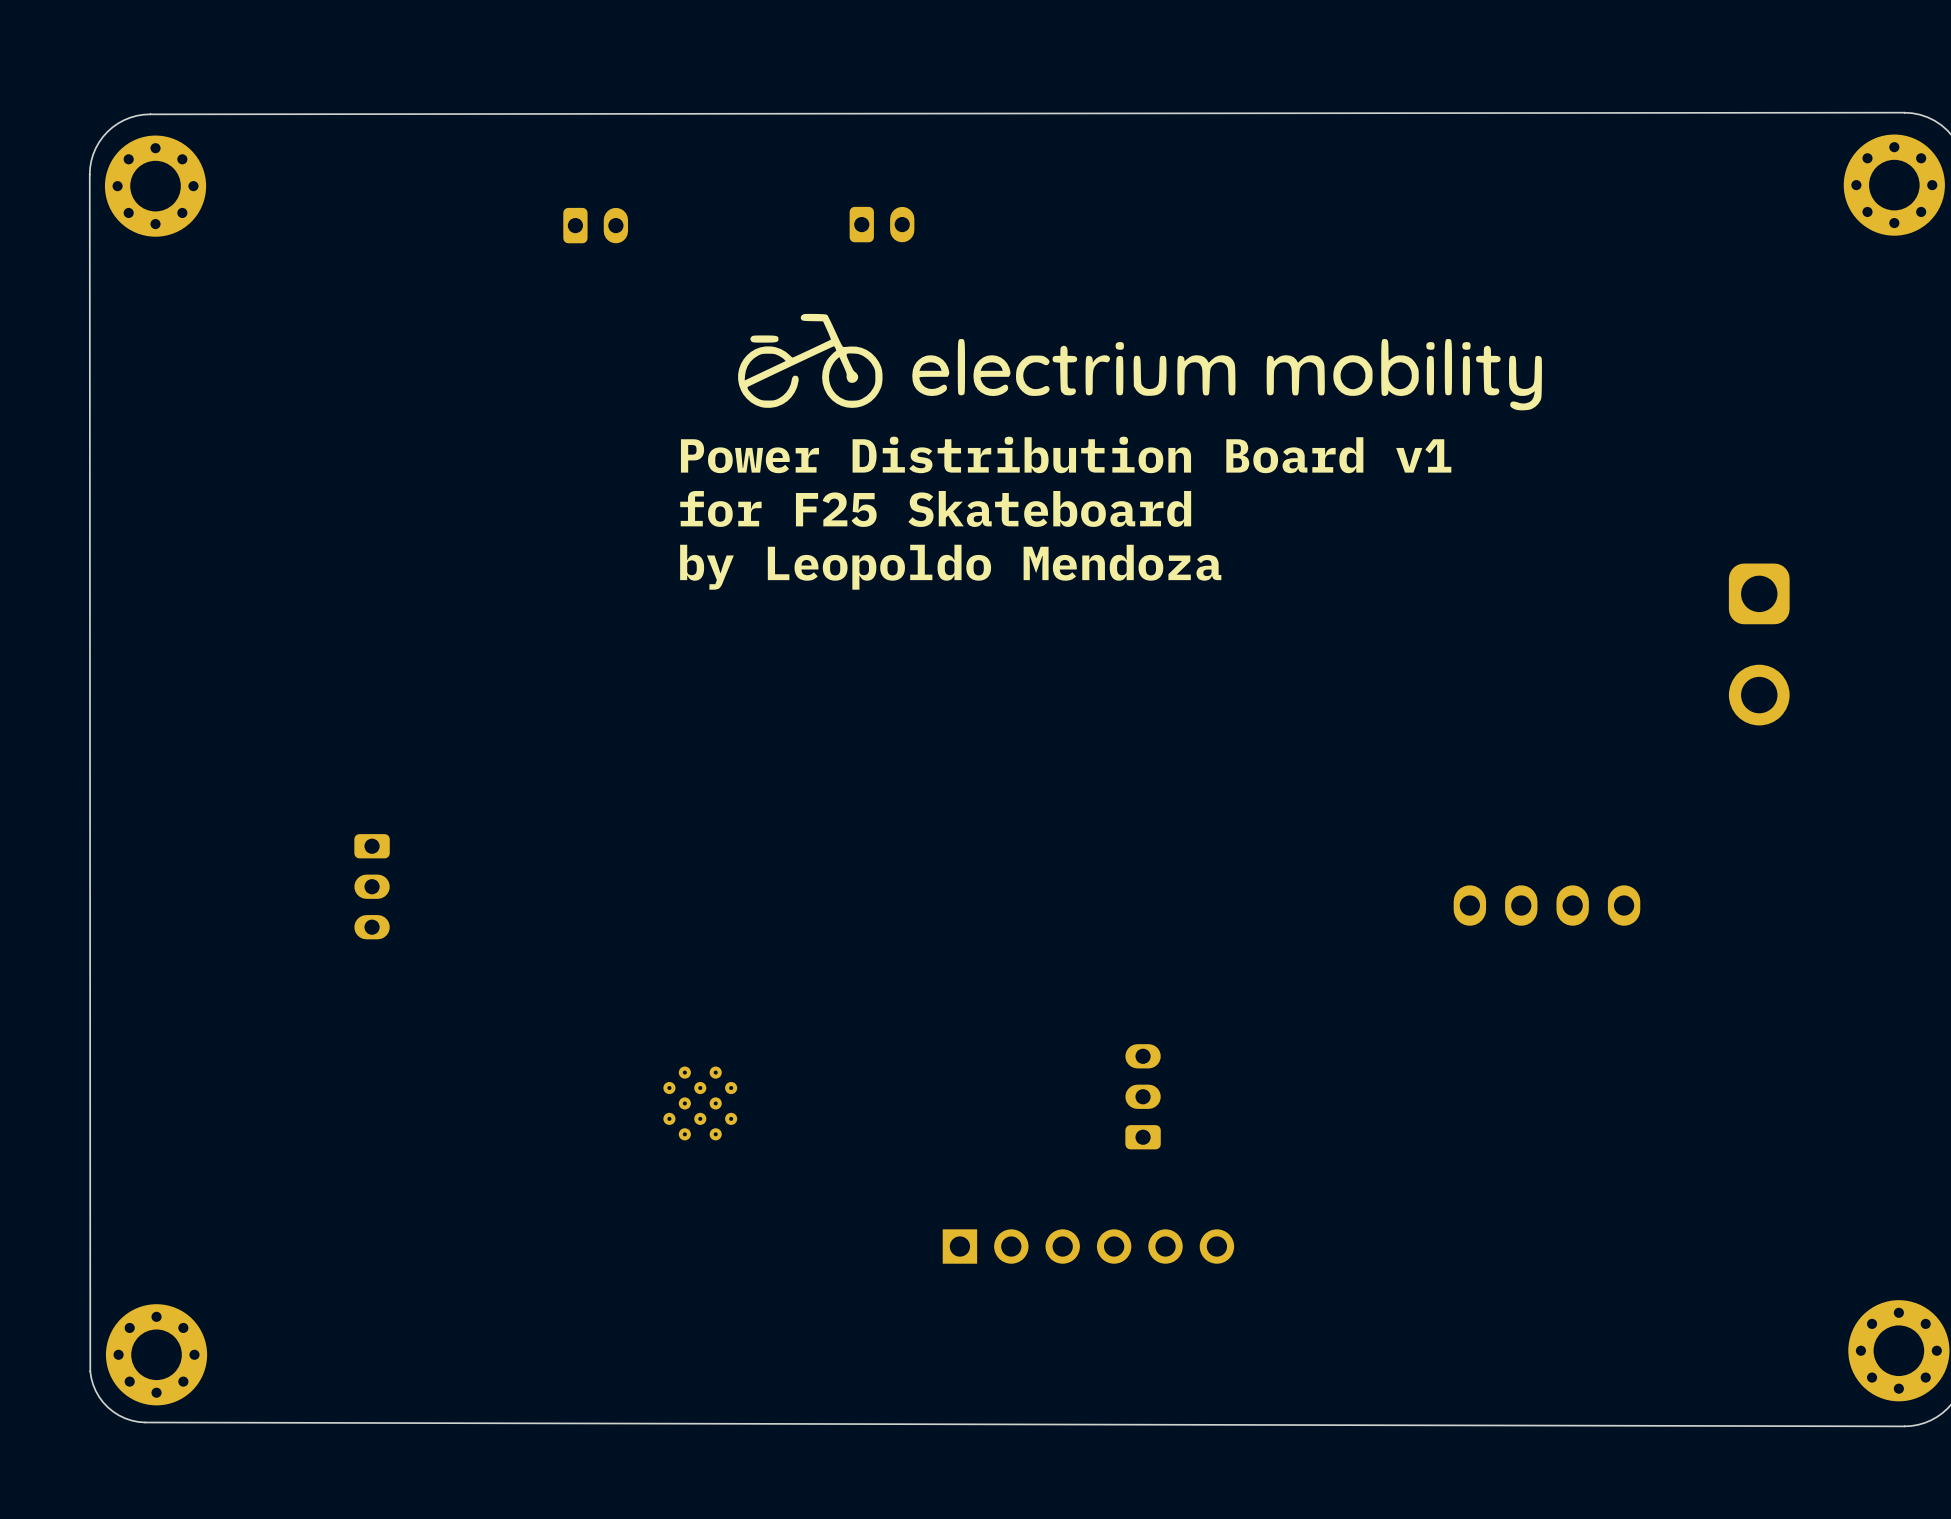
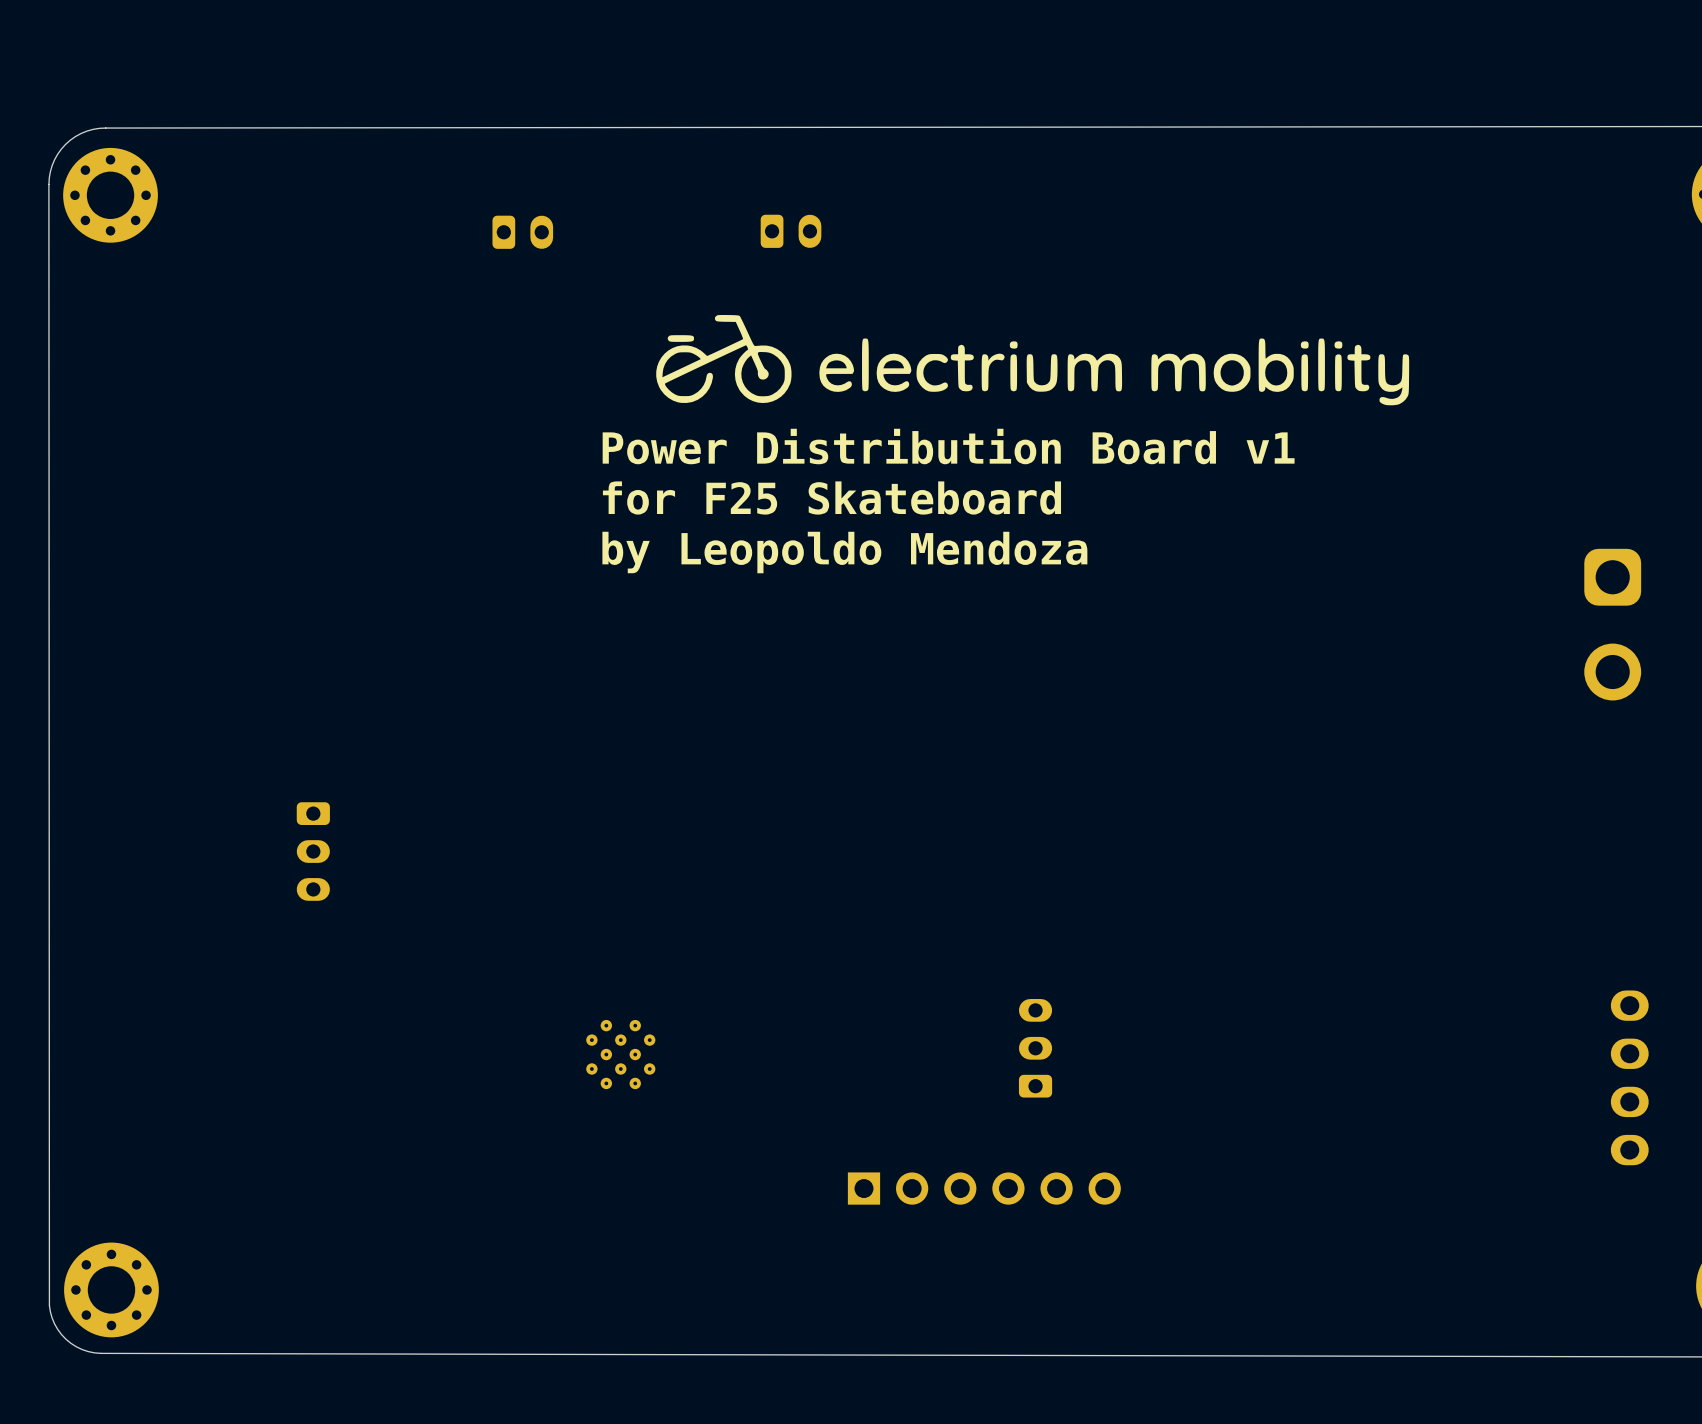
part rotation: 0° (1546, 905) -> 90° clockwise (1629, 1077)
part position: (1546, 905) -> (1629, 1077)

